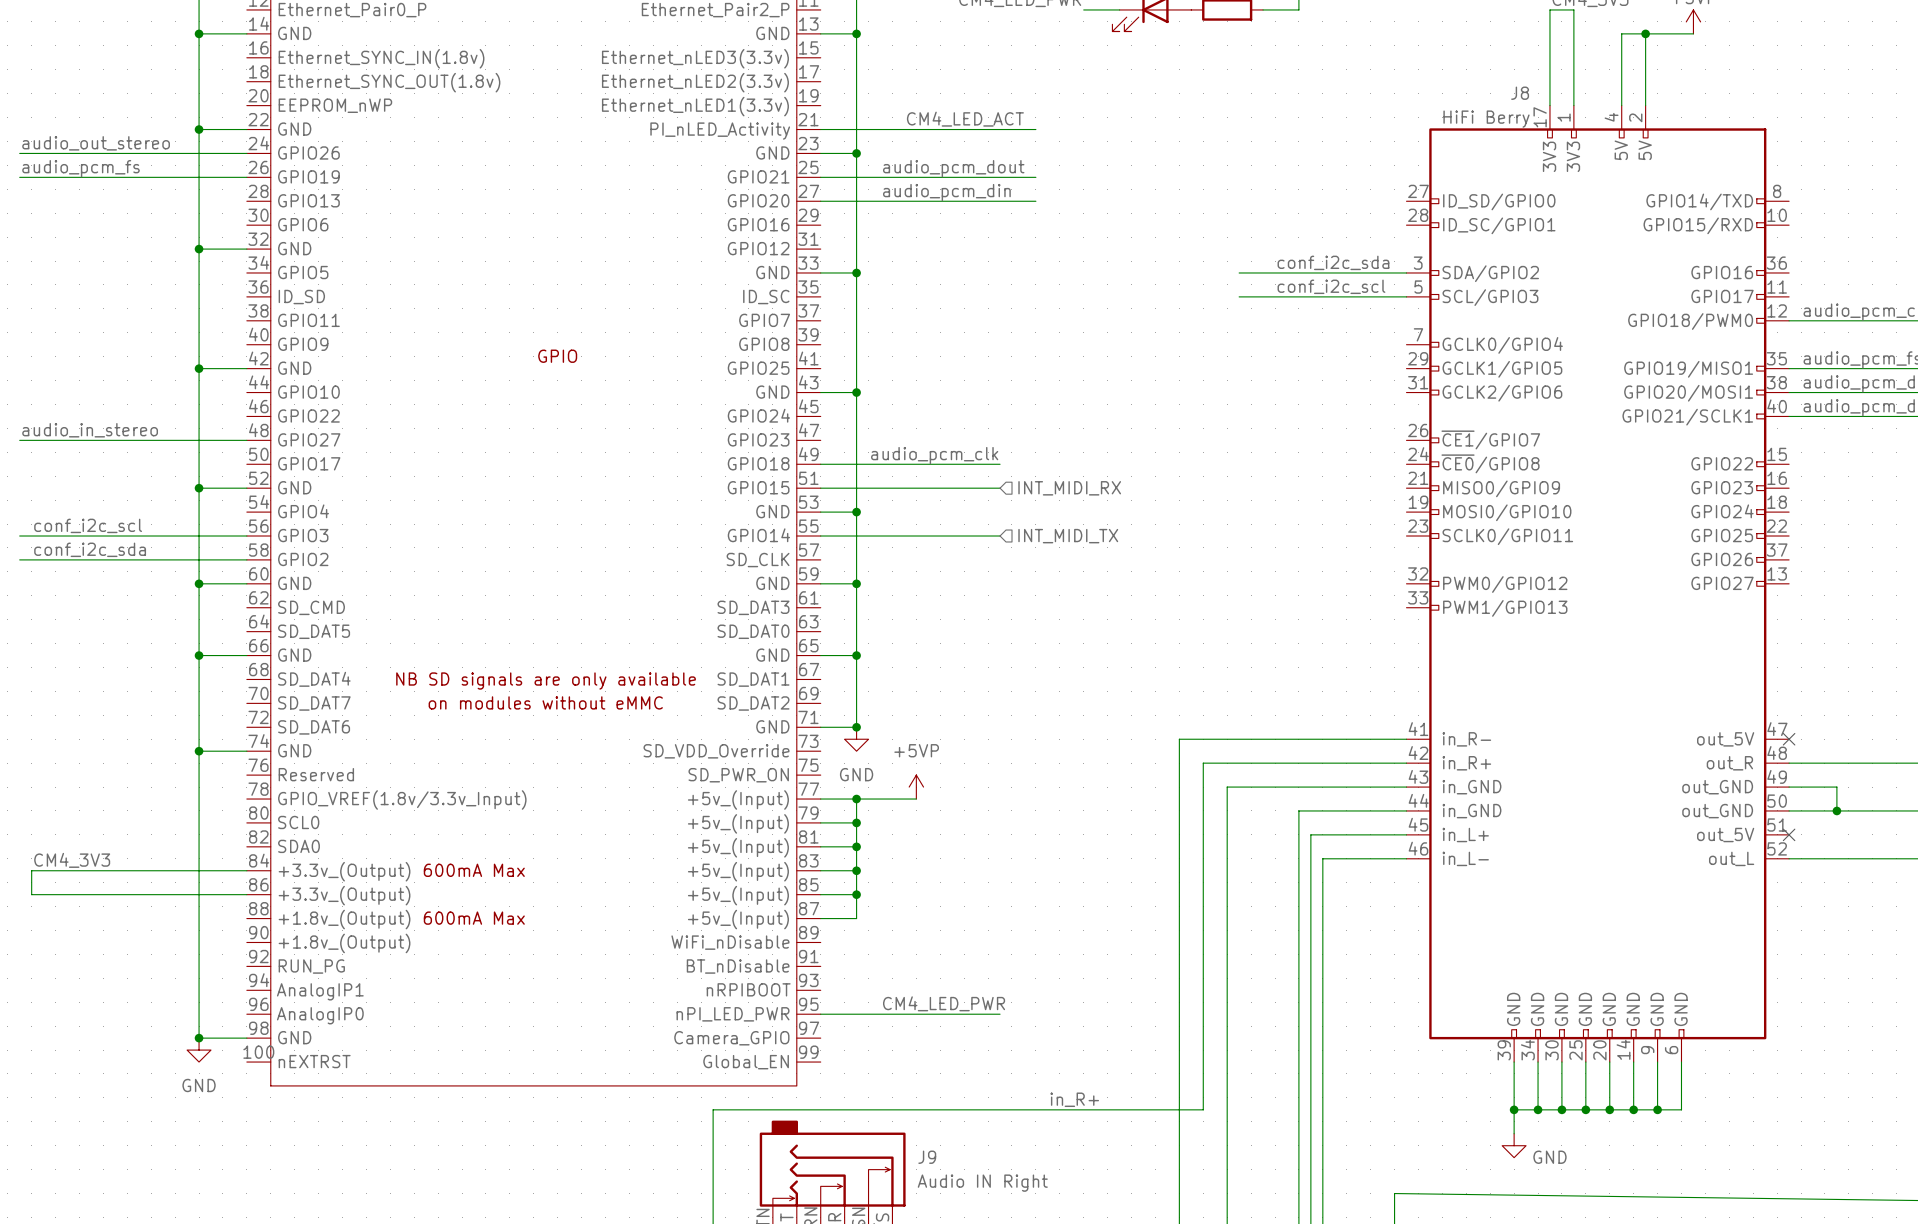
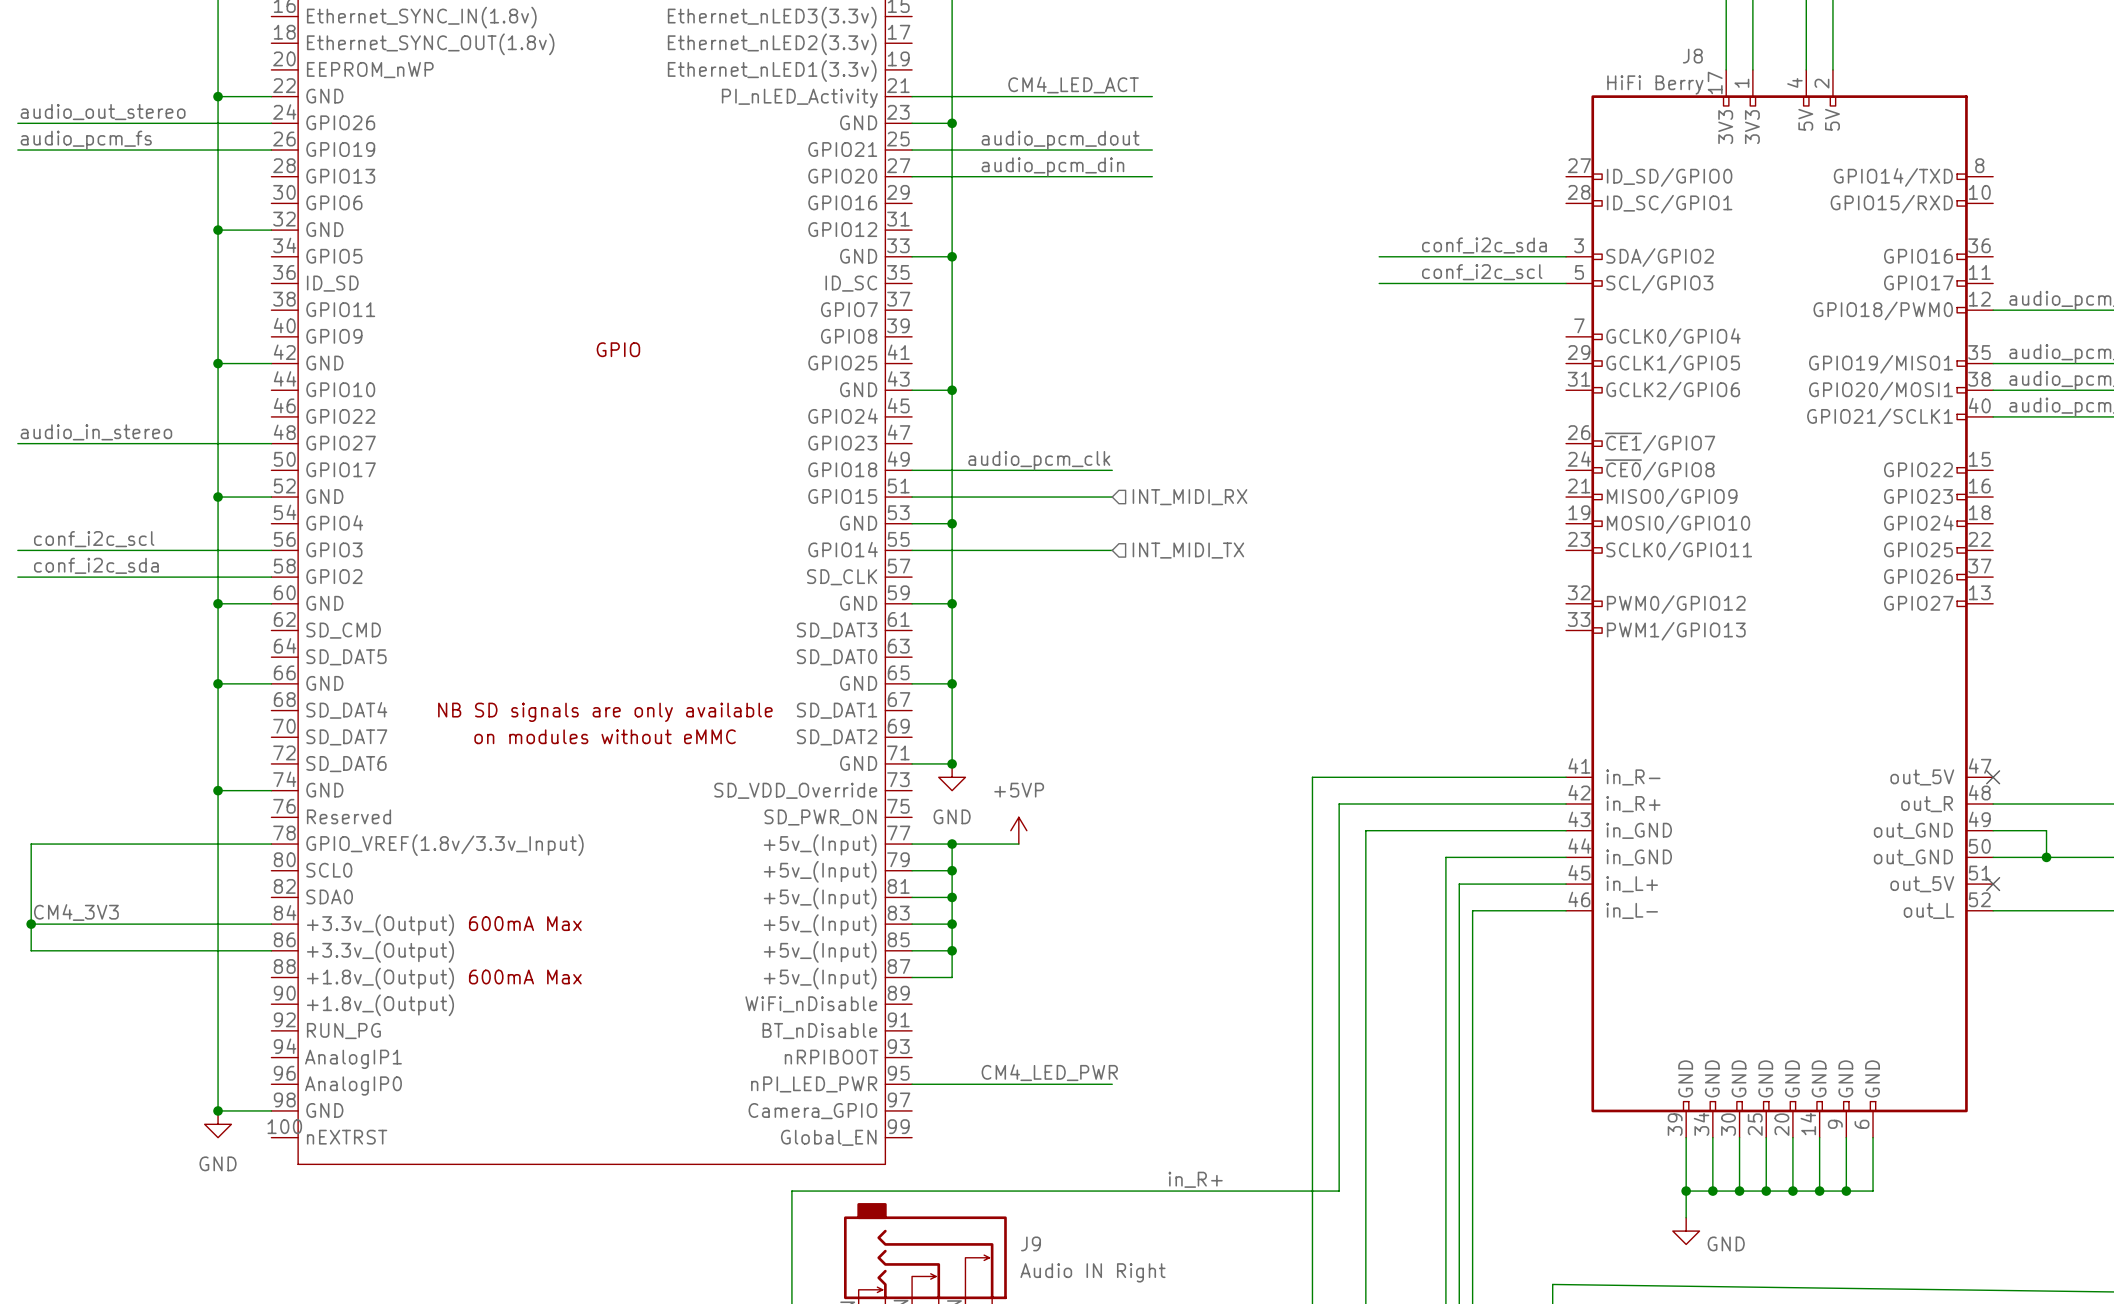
wire: none -> (271, 844) (31, 844) (31, 924)
junction: none -> (31, 924)

